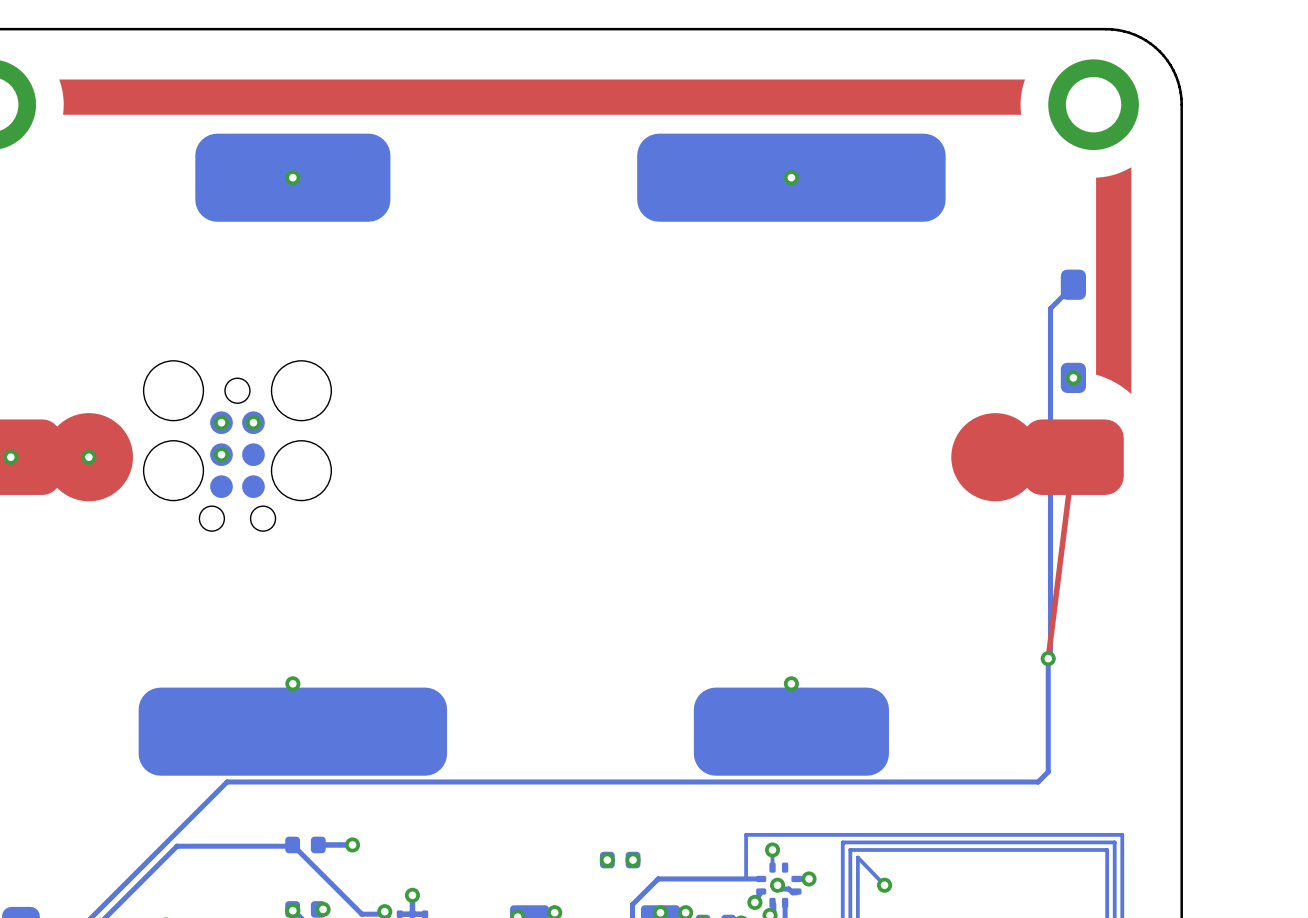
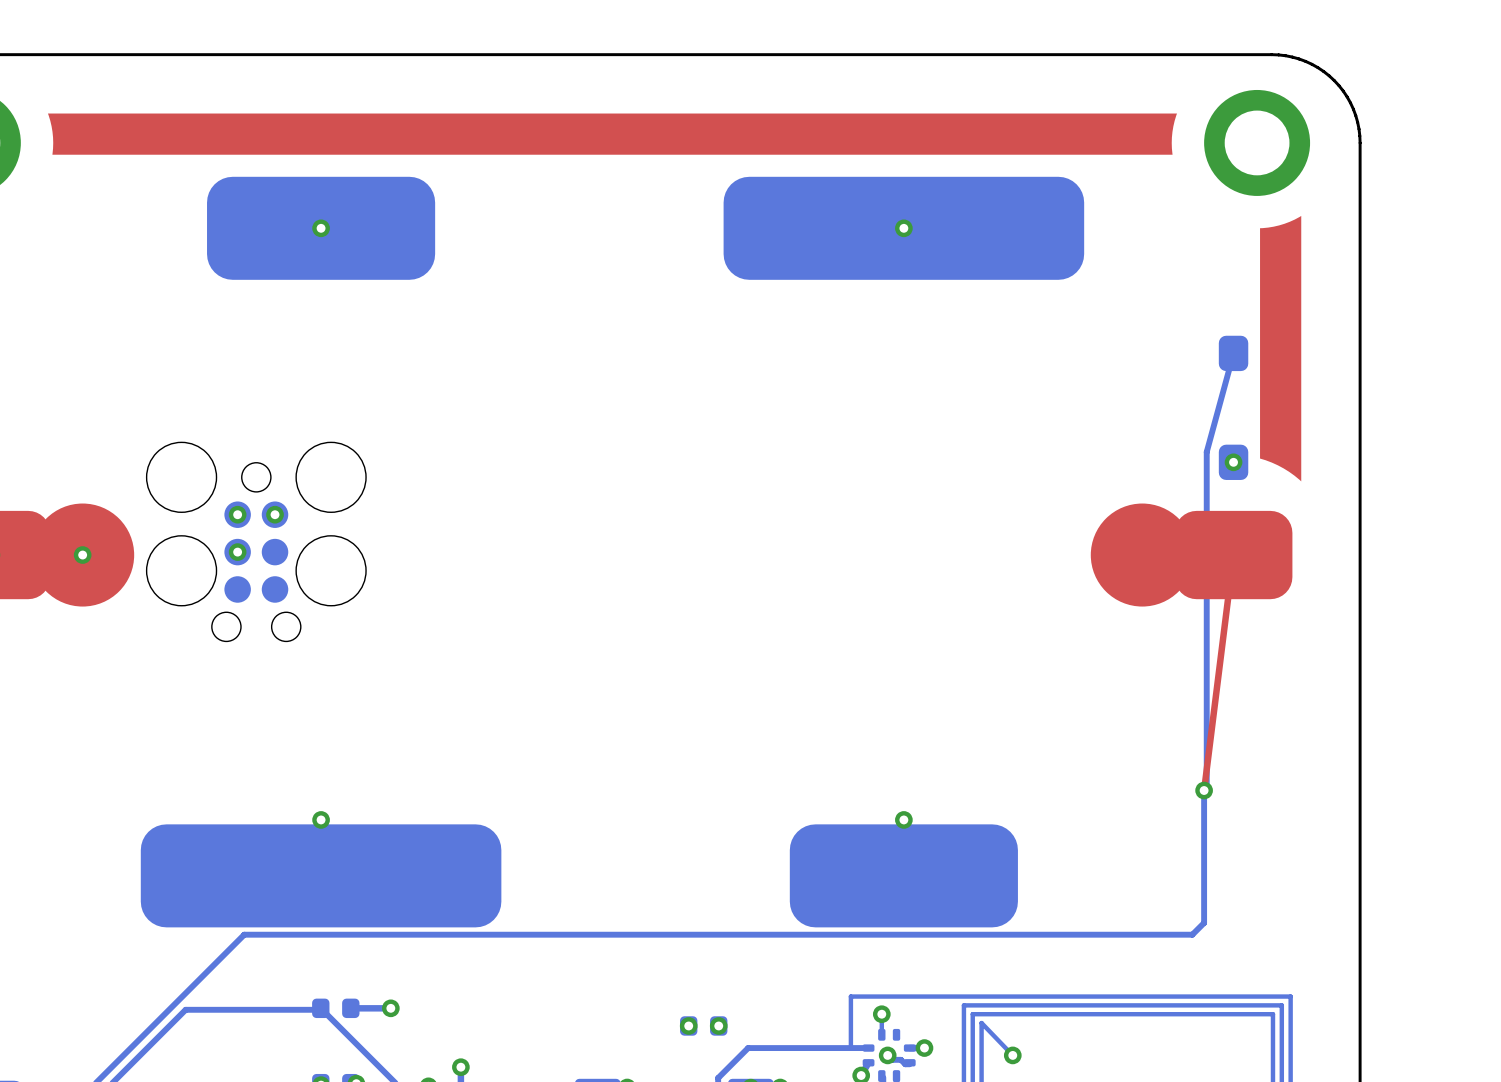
bottom track: (1073, 285) (1050, 308) (1050, 369) -> (1233, 354) (1206, 452)

